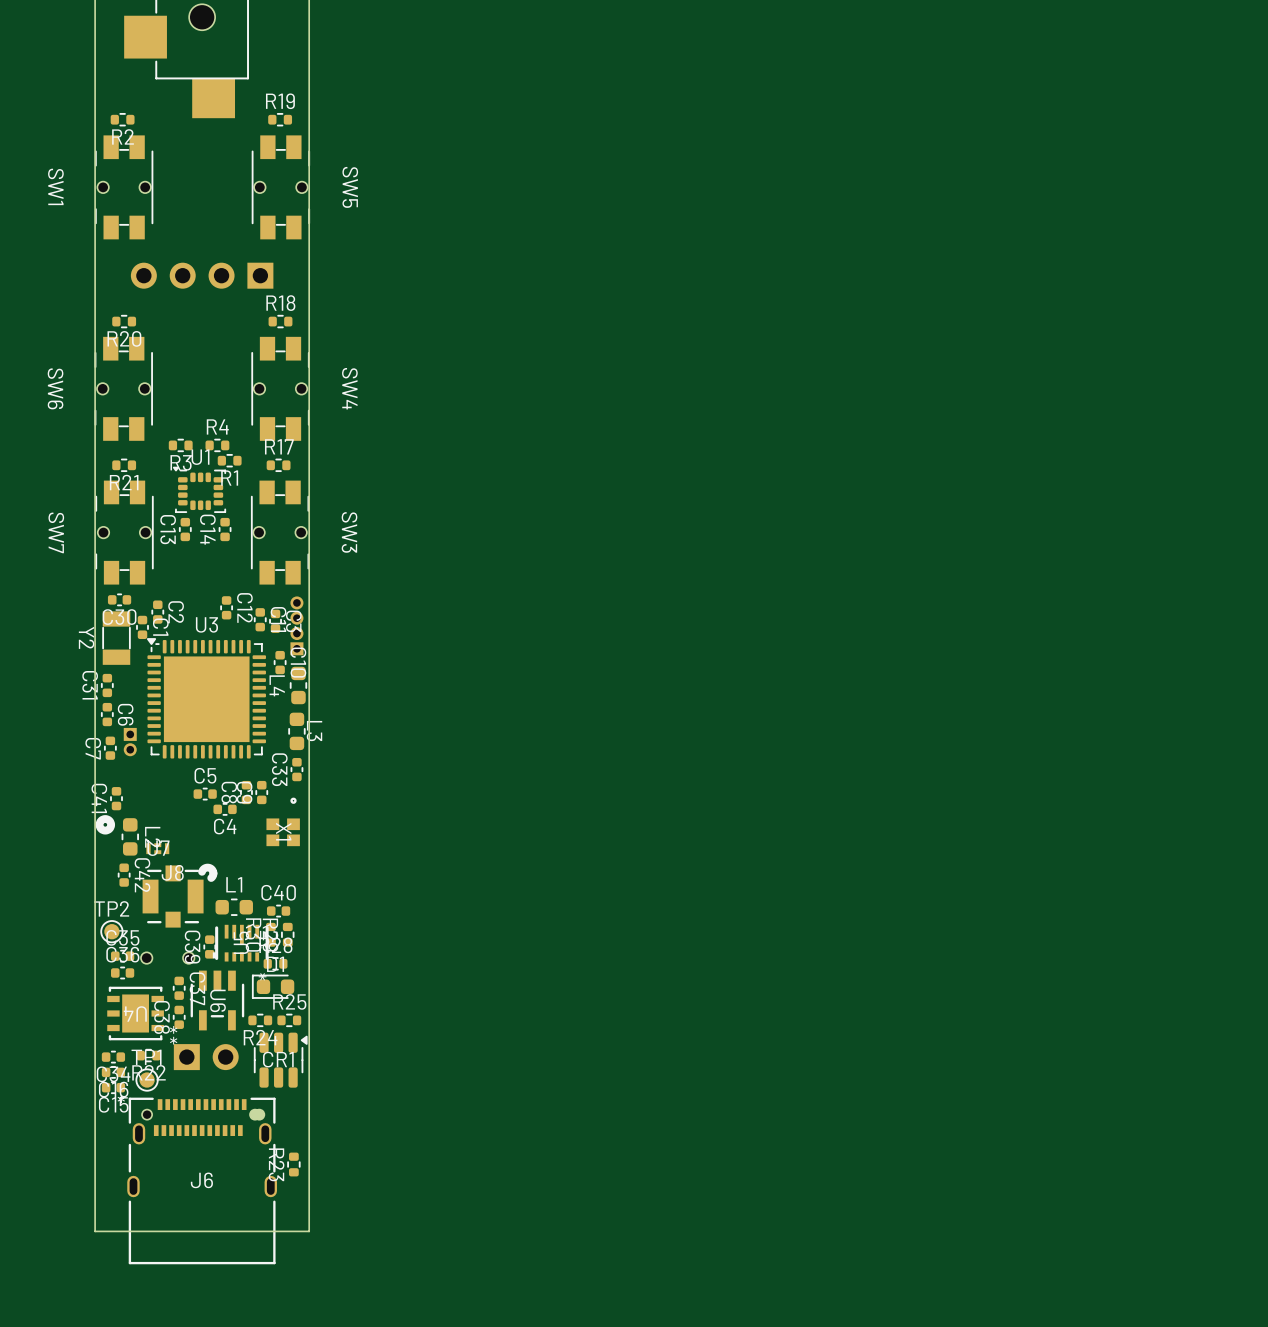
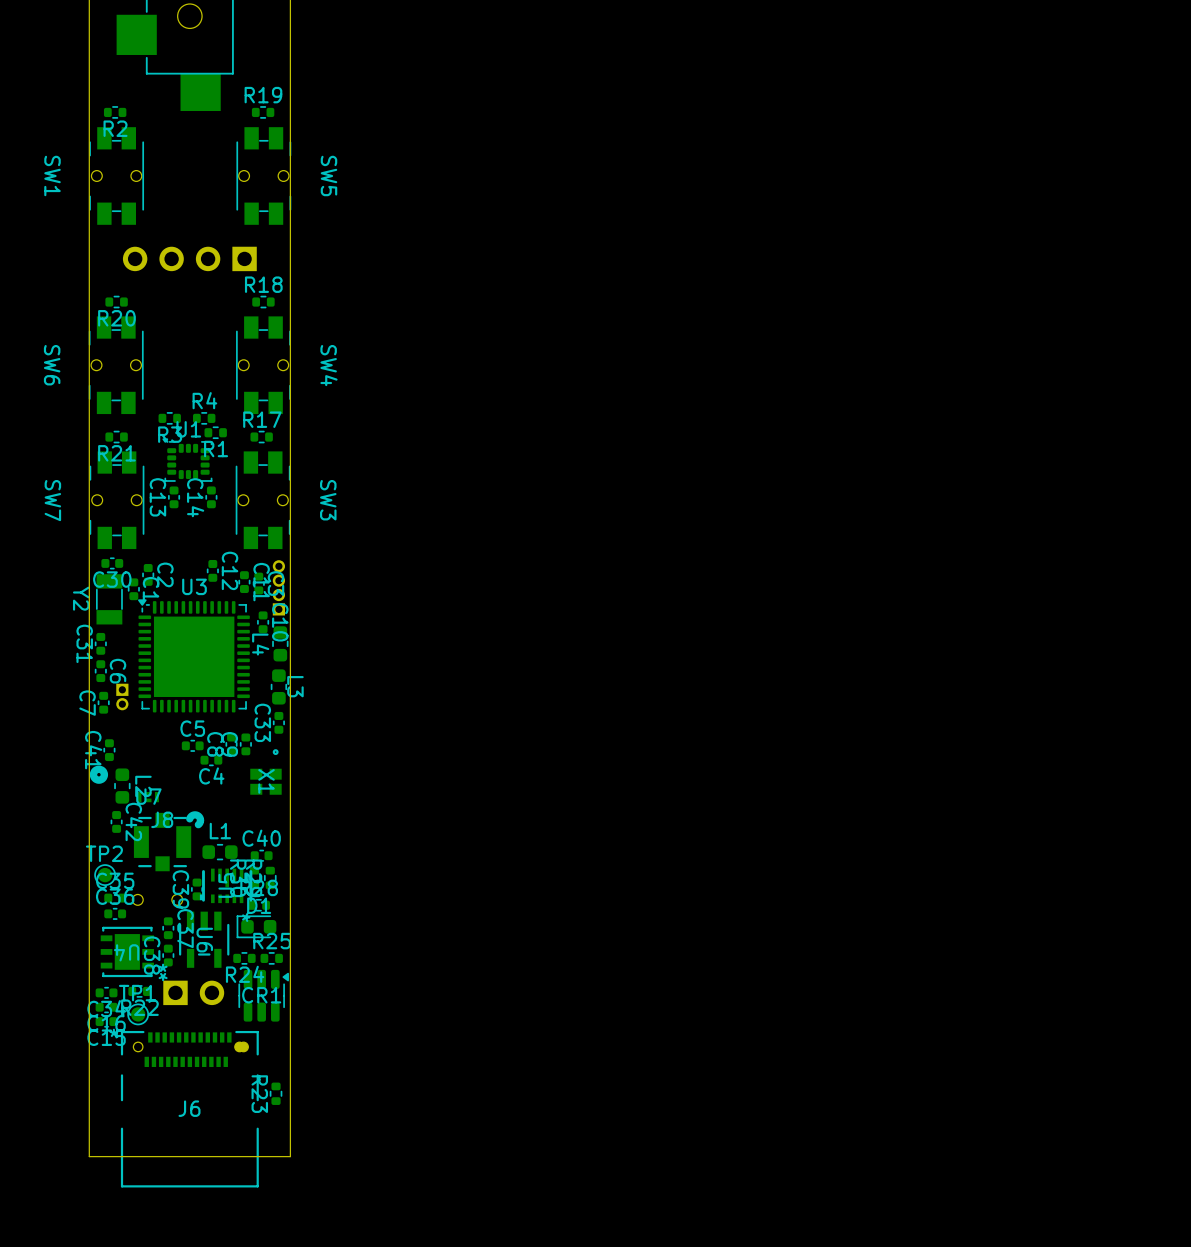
J6 footprint: [127, 1097, 278, 1265] -> [120, 1030, 259, 1188]

